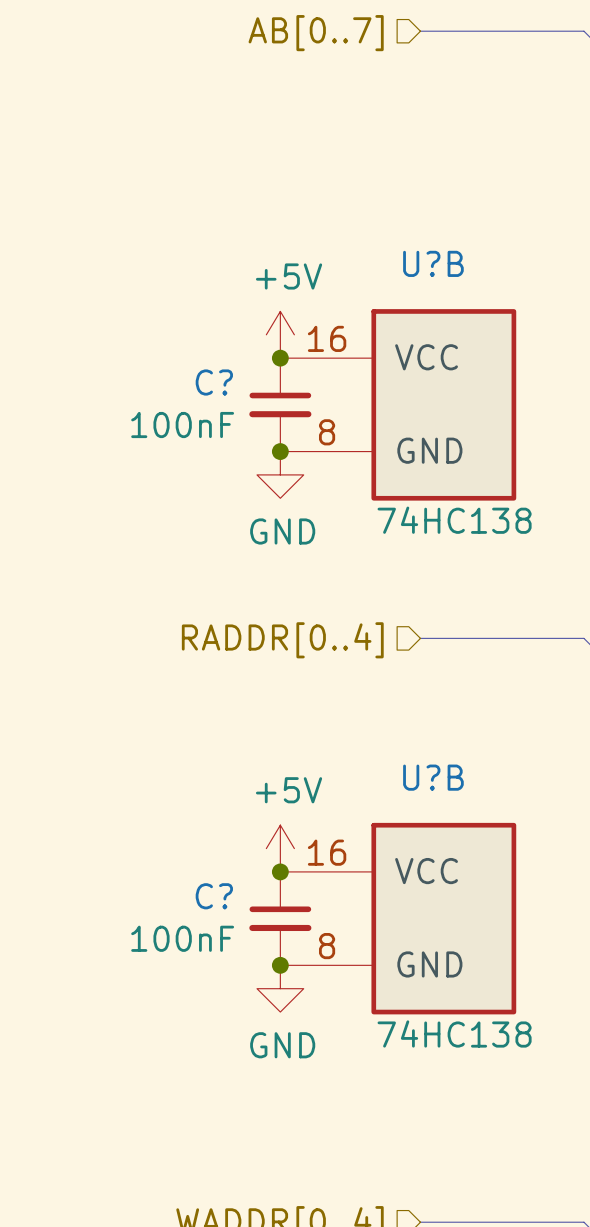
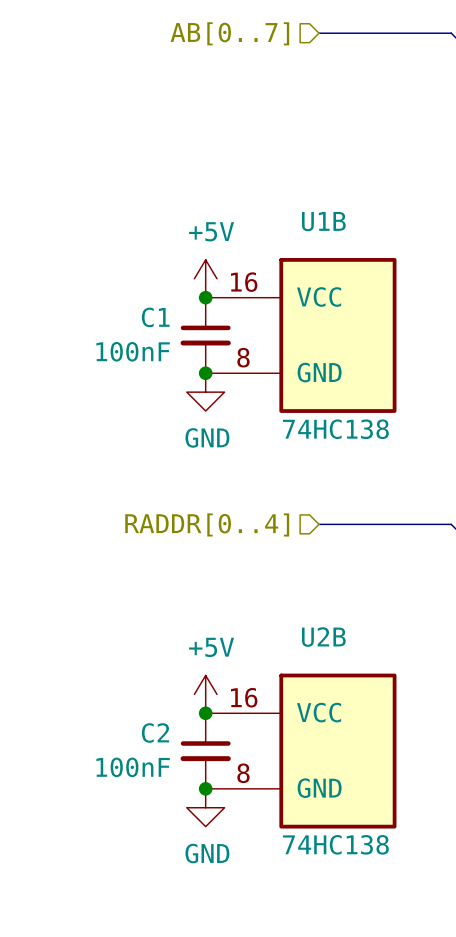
U?B name: U?B (433, 263) -> U1B (323, 221)
C? name: C? (214, 382) -> C1 (155, 317)
U?B name: U?B (433, 777) -> U2B (323, 637)
C? name: C? (214, 896) -> C2 (155, 733)

